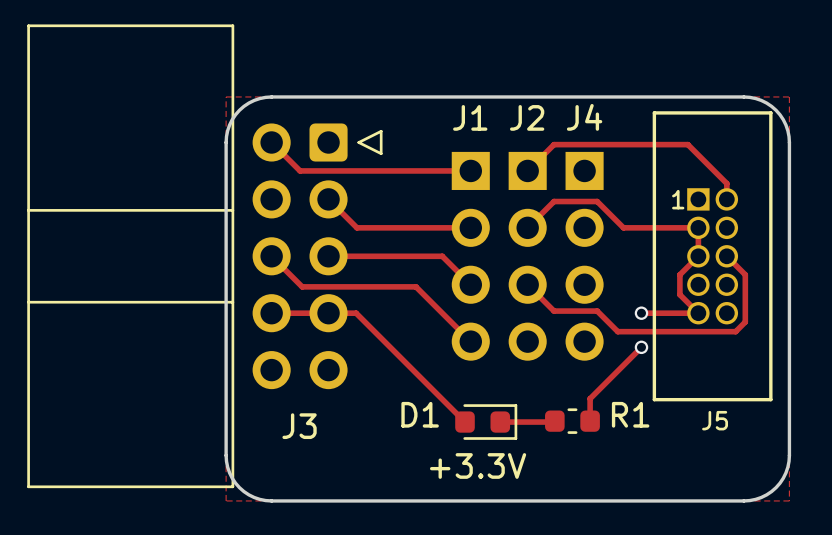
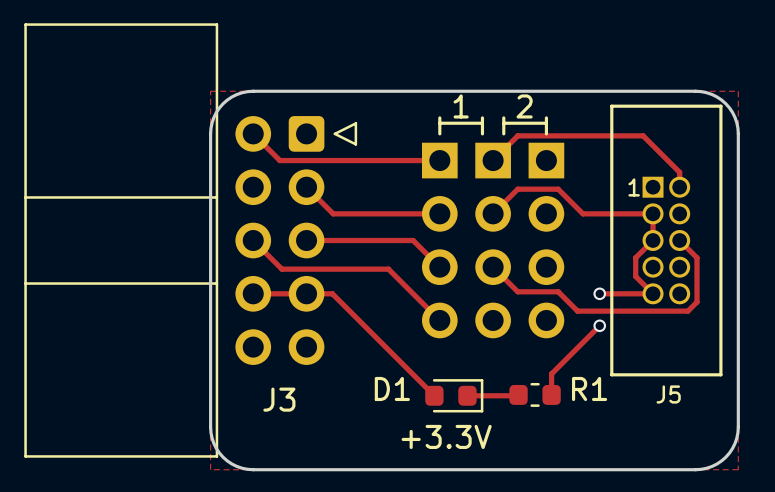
text: none -> 1 (461, 106)
text: none -> 2 (524, 106)
J1 name: J1 (470, 117) -> none
J2 name: J2 (527, 117) -> none
J4 name: J4 (584, 117) -> none
line: none -> (439, 117) (439, 133)
line: none -> (482, 117) (482, 133)
line: none -> (503, 117) (503, 133)
line: none -> (546, 117) (546, 133)
line: none -> (439, 123) (482, 123)
line: none -> (503, 123) (546, 123)

